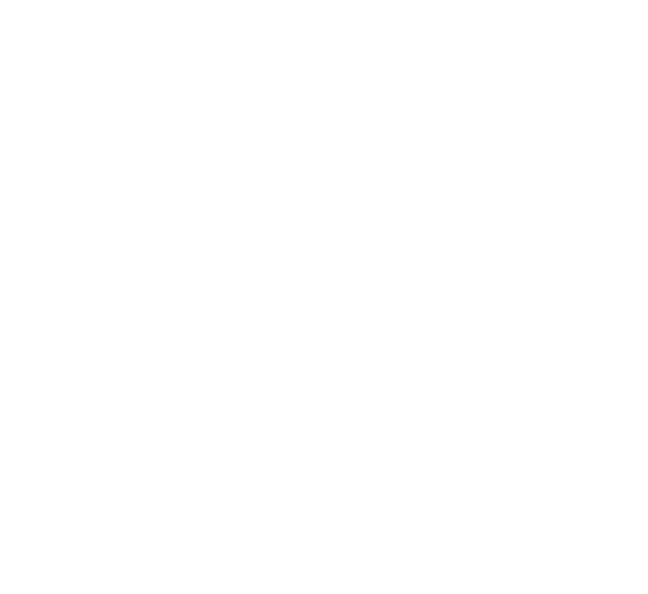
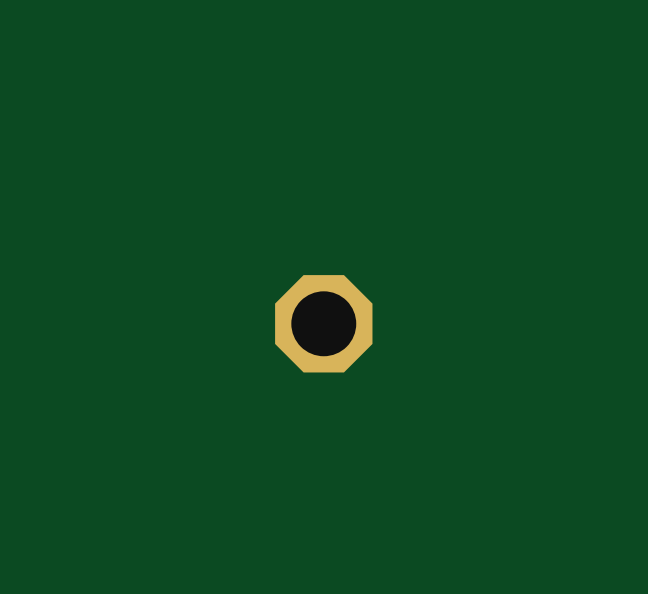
part: none -> (323, 323)

